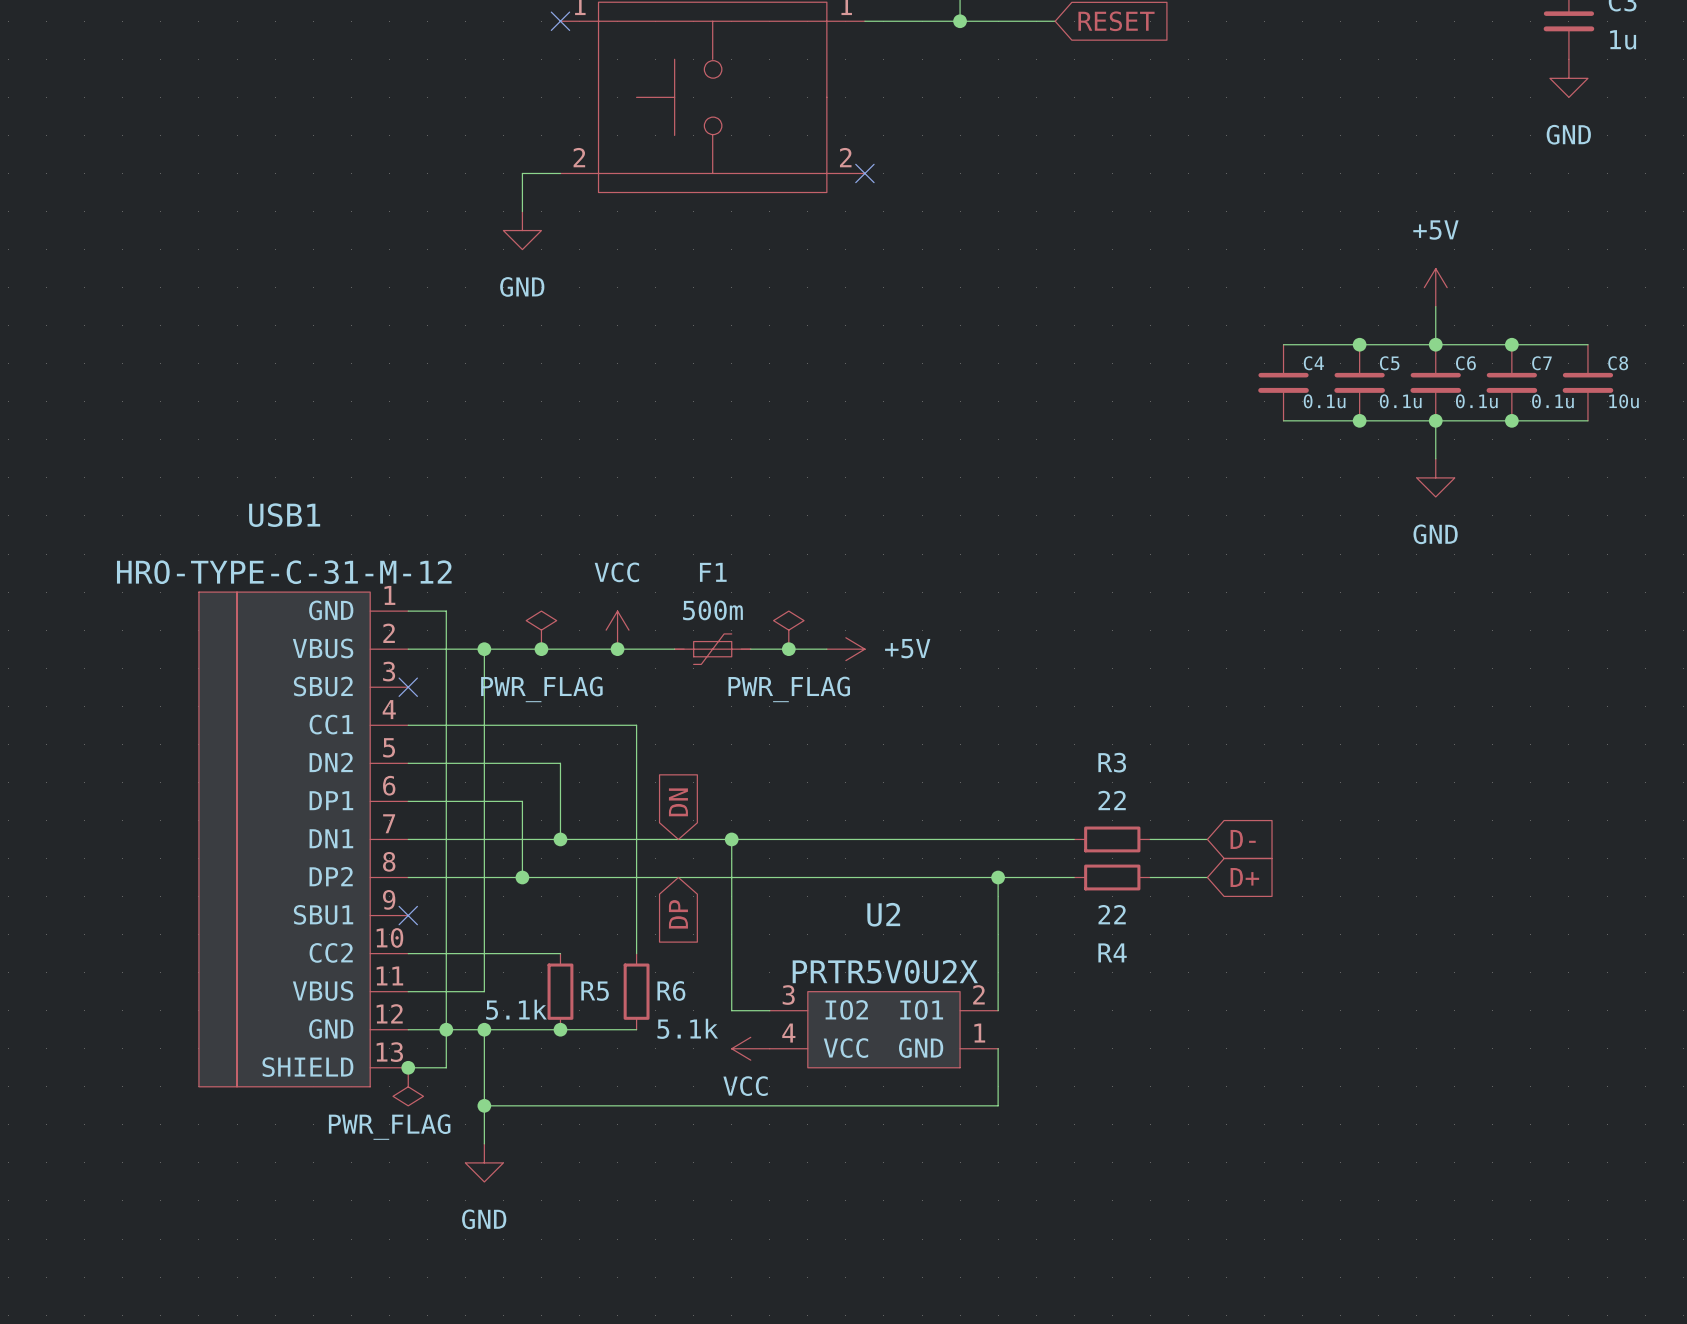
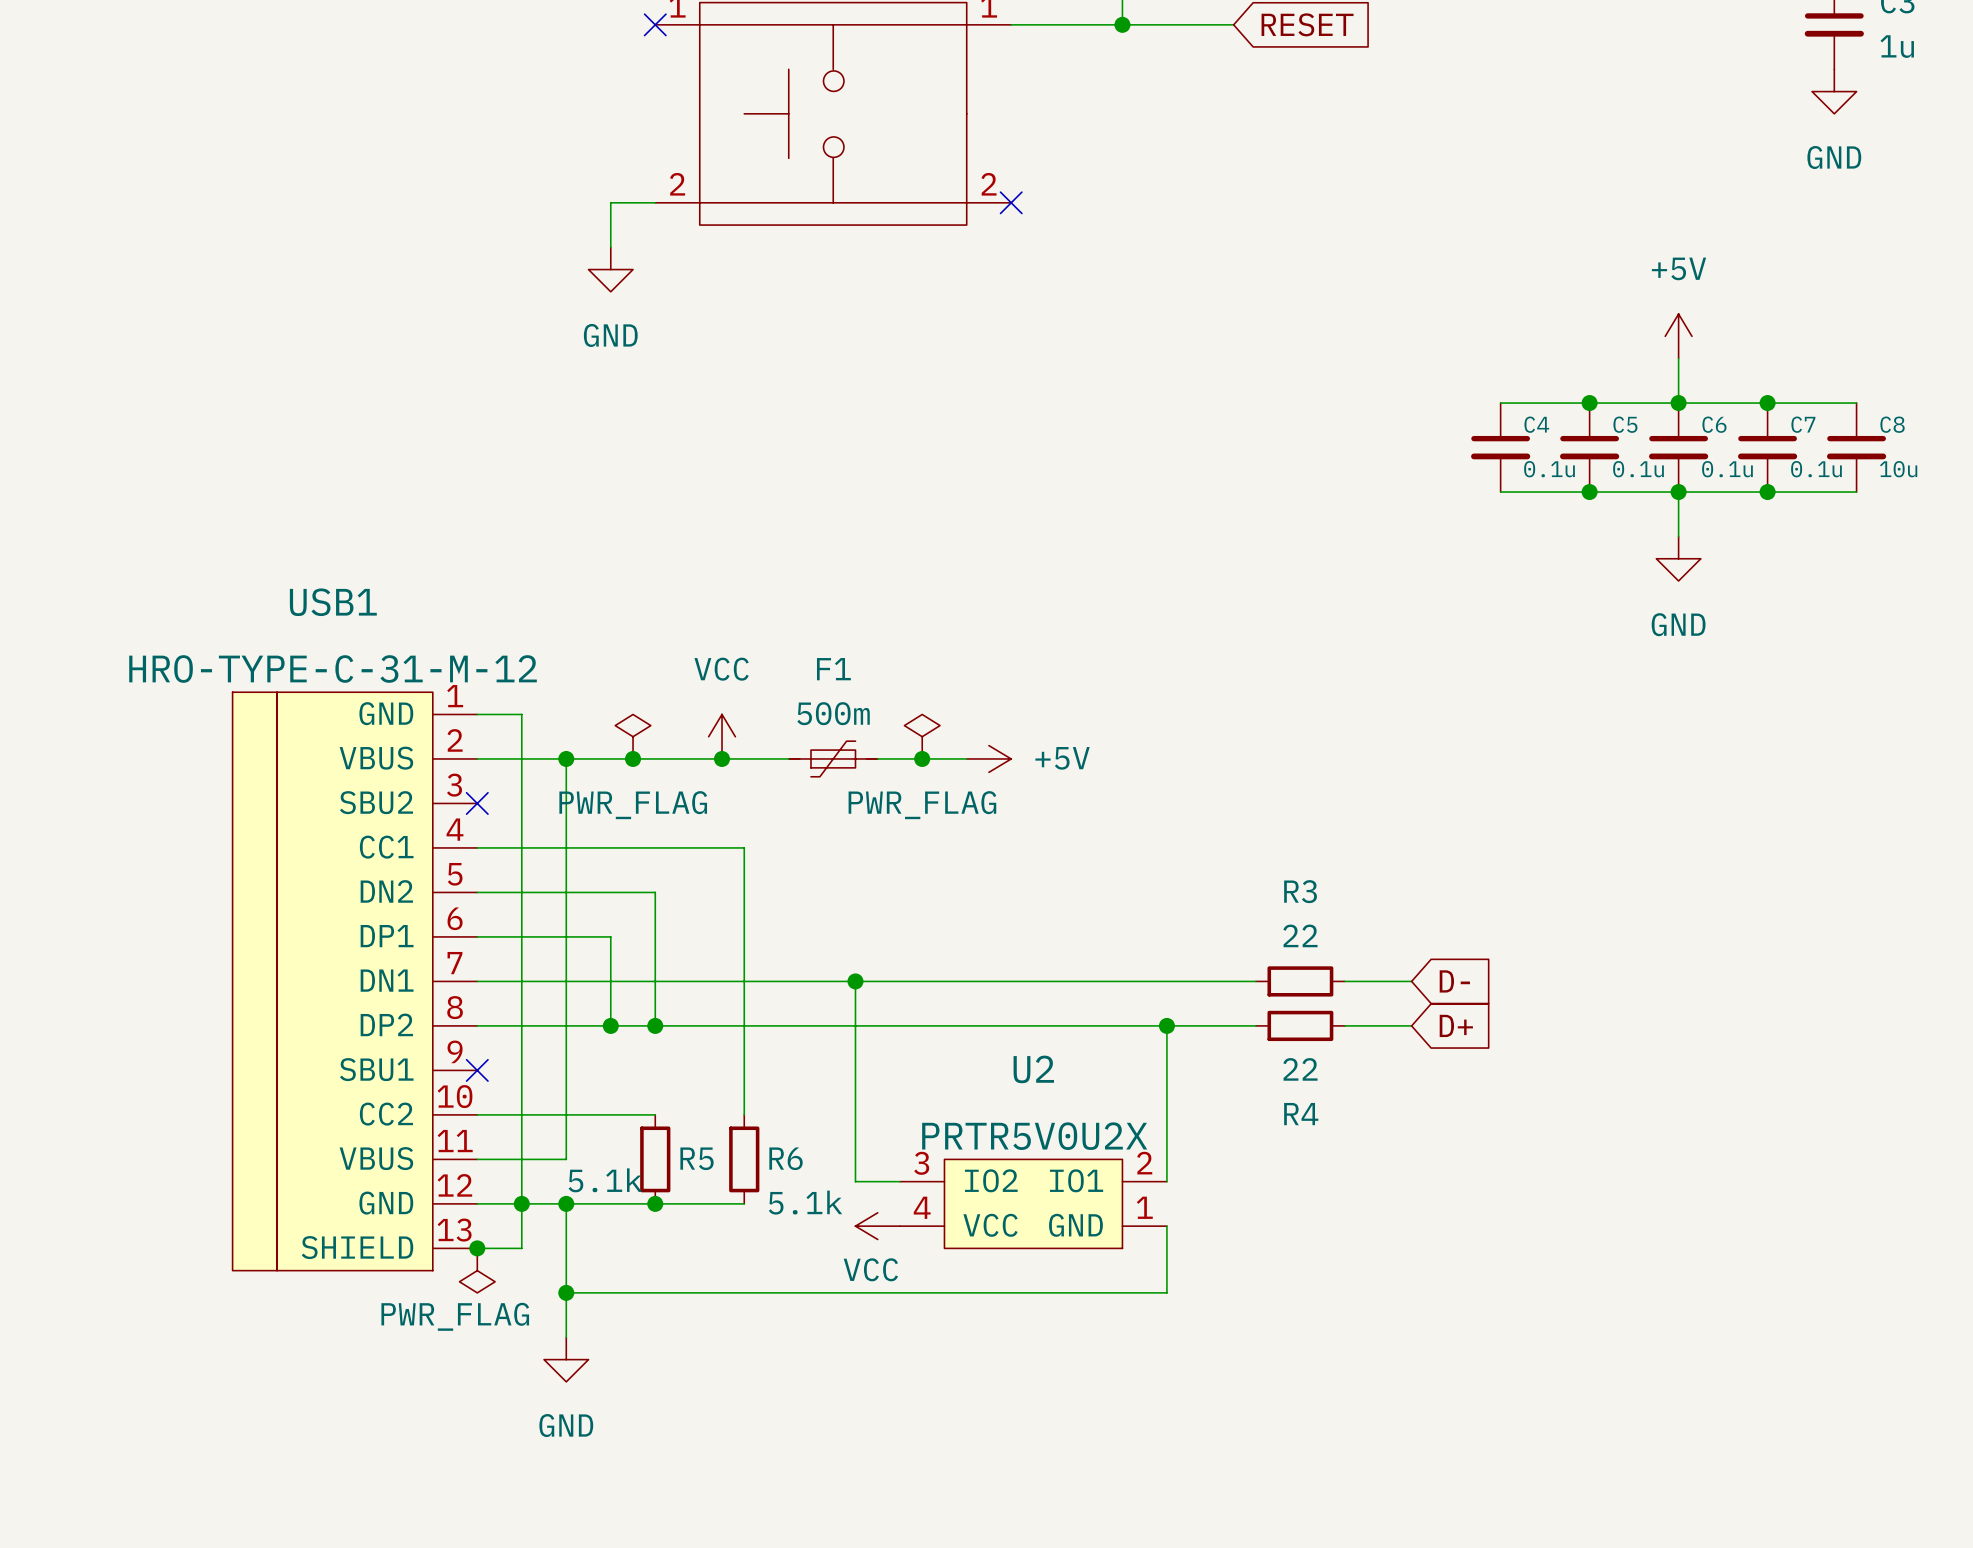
global label: DN (678, 802) -> none
wire: none -> (655, 981) (655, 1025)
junction position: (560, 839) -> (655, 1025)
global label: DP (678, 914) -> none

